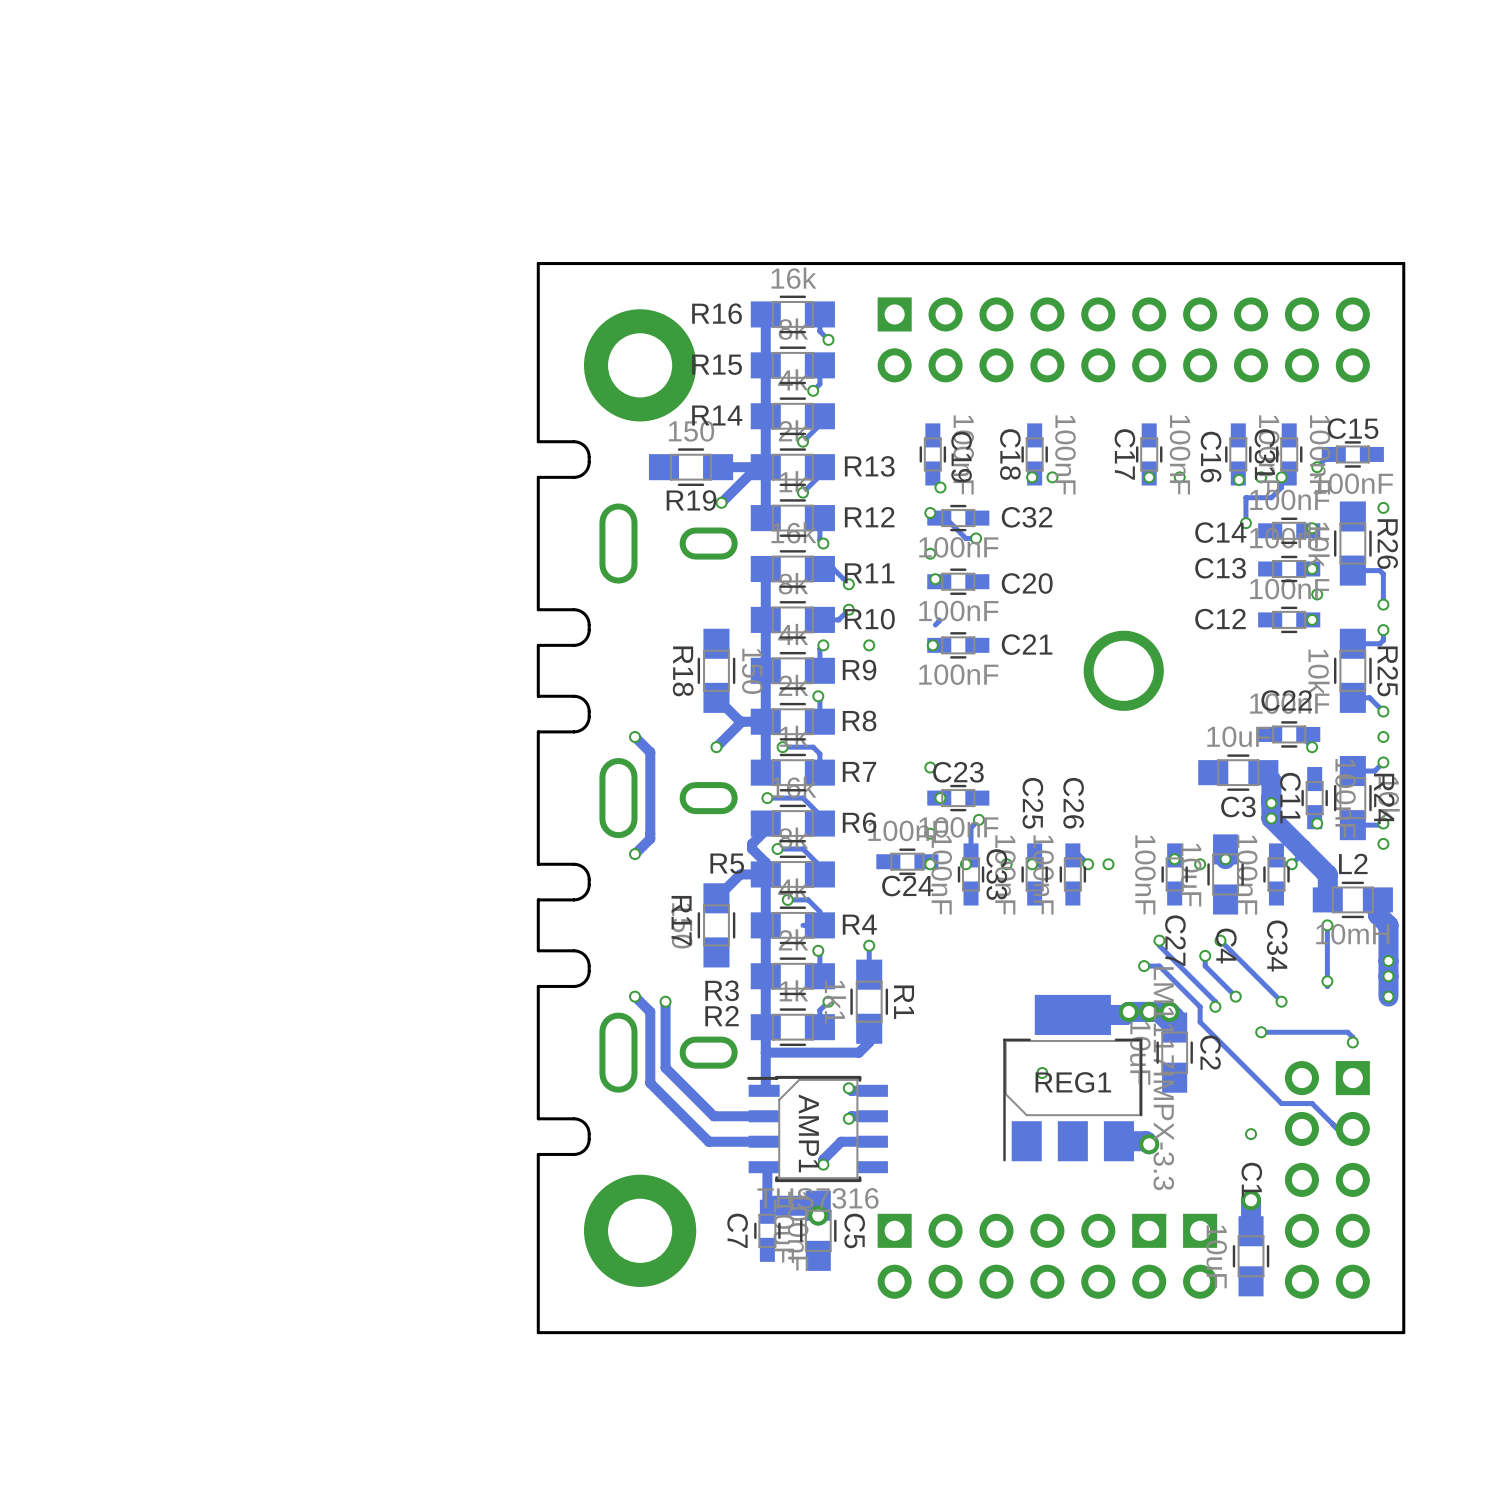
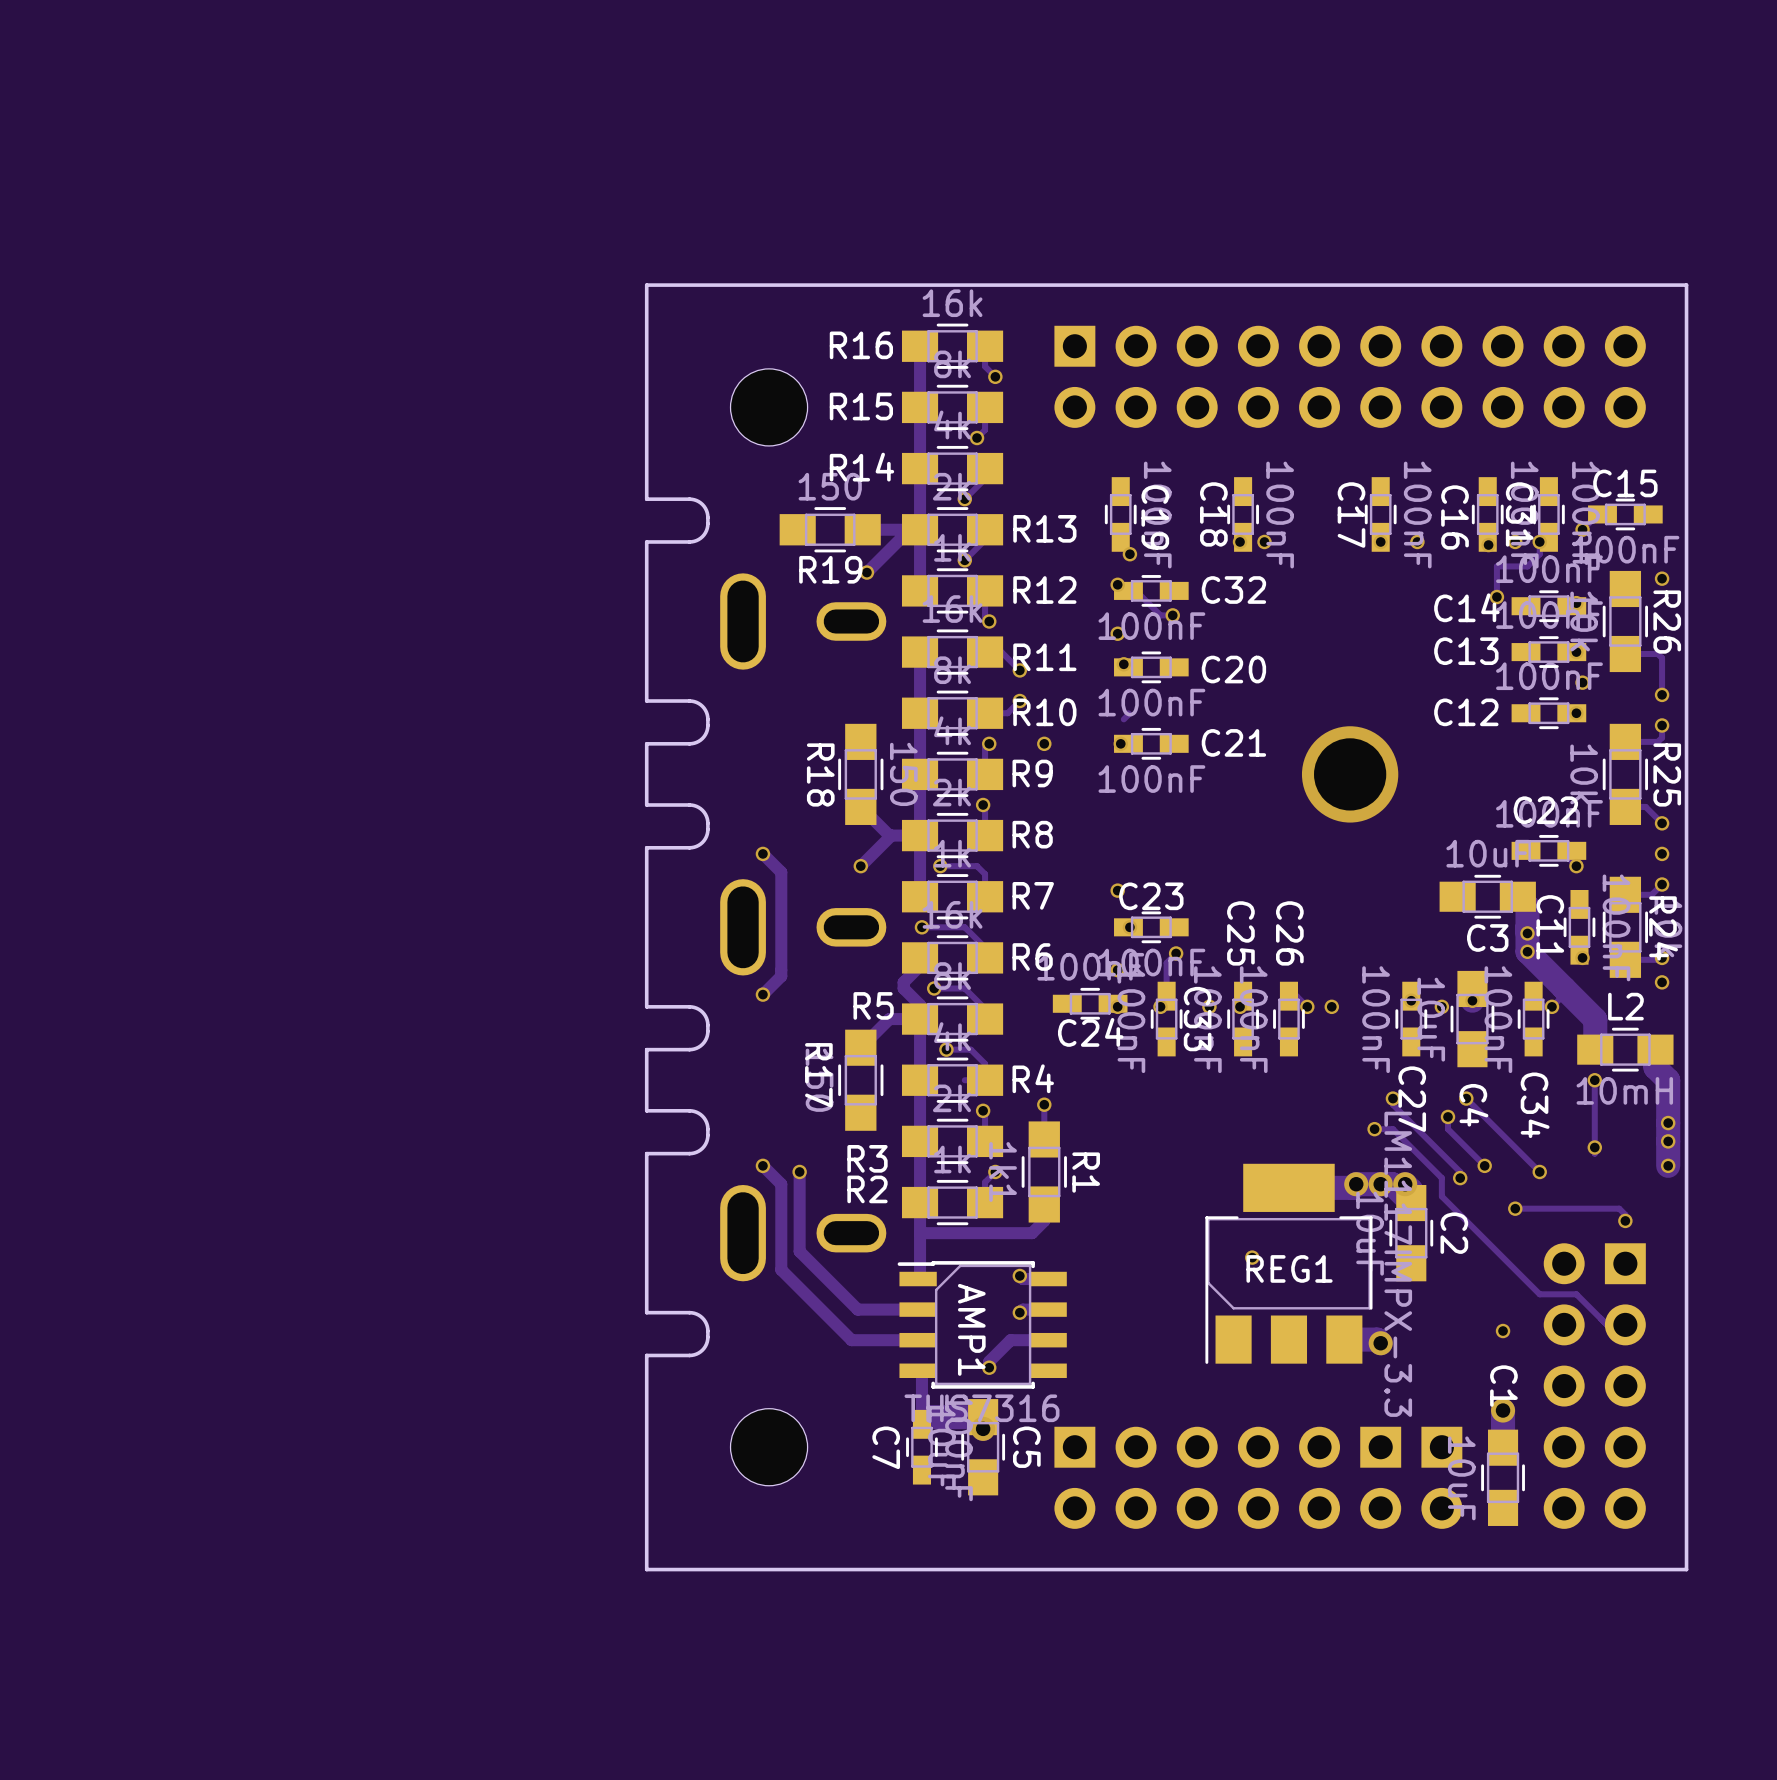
part footprint: [583, 309, 697, 422] -> [730, 368, 808, 446]
part footprint: [583, 1174, 697, 1287] -> [730, 1408, 808, 1486]

